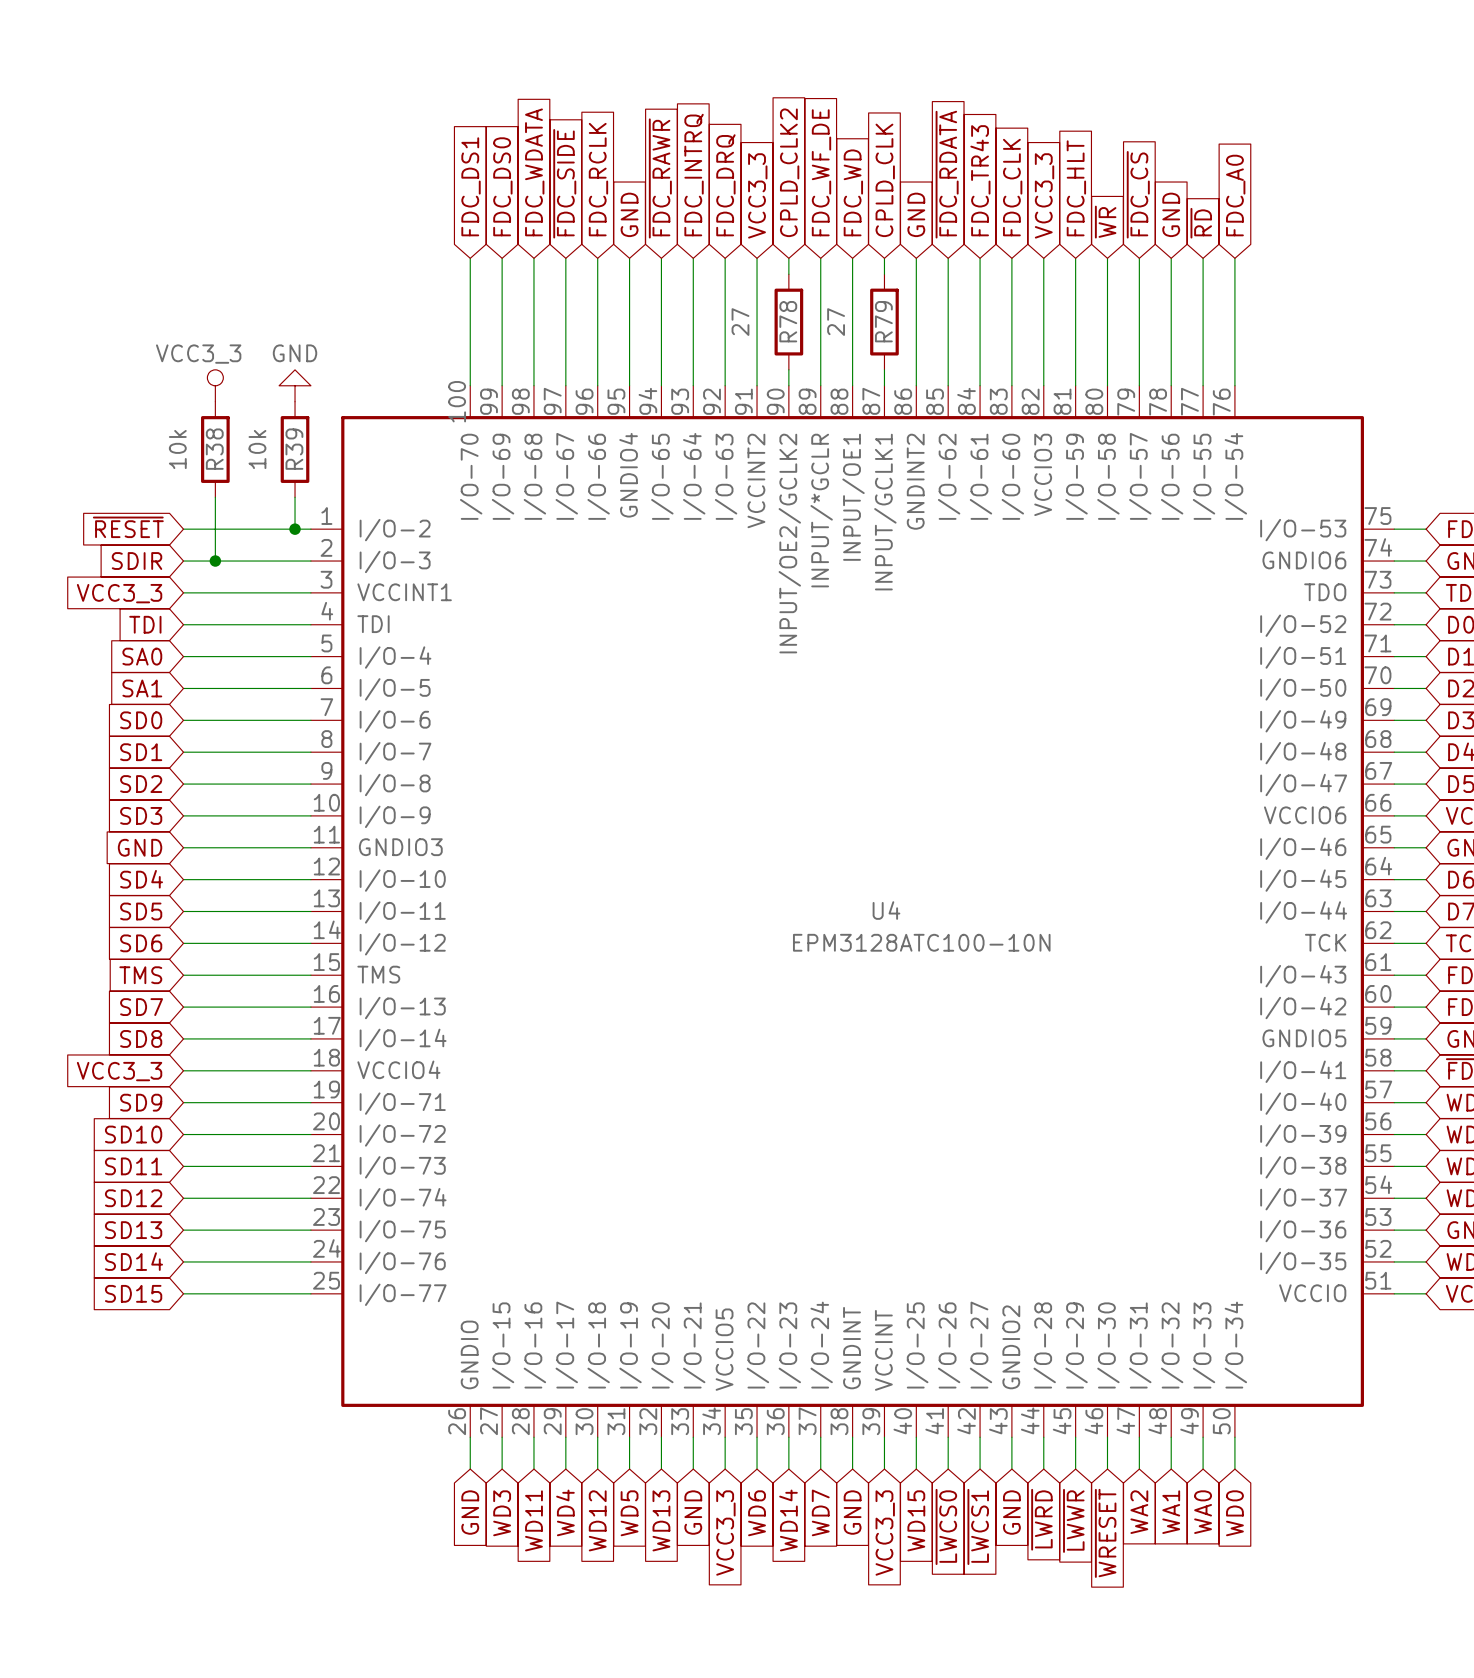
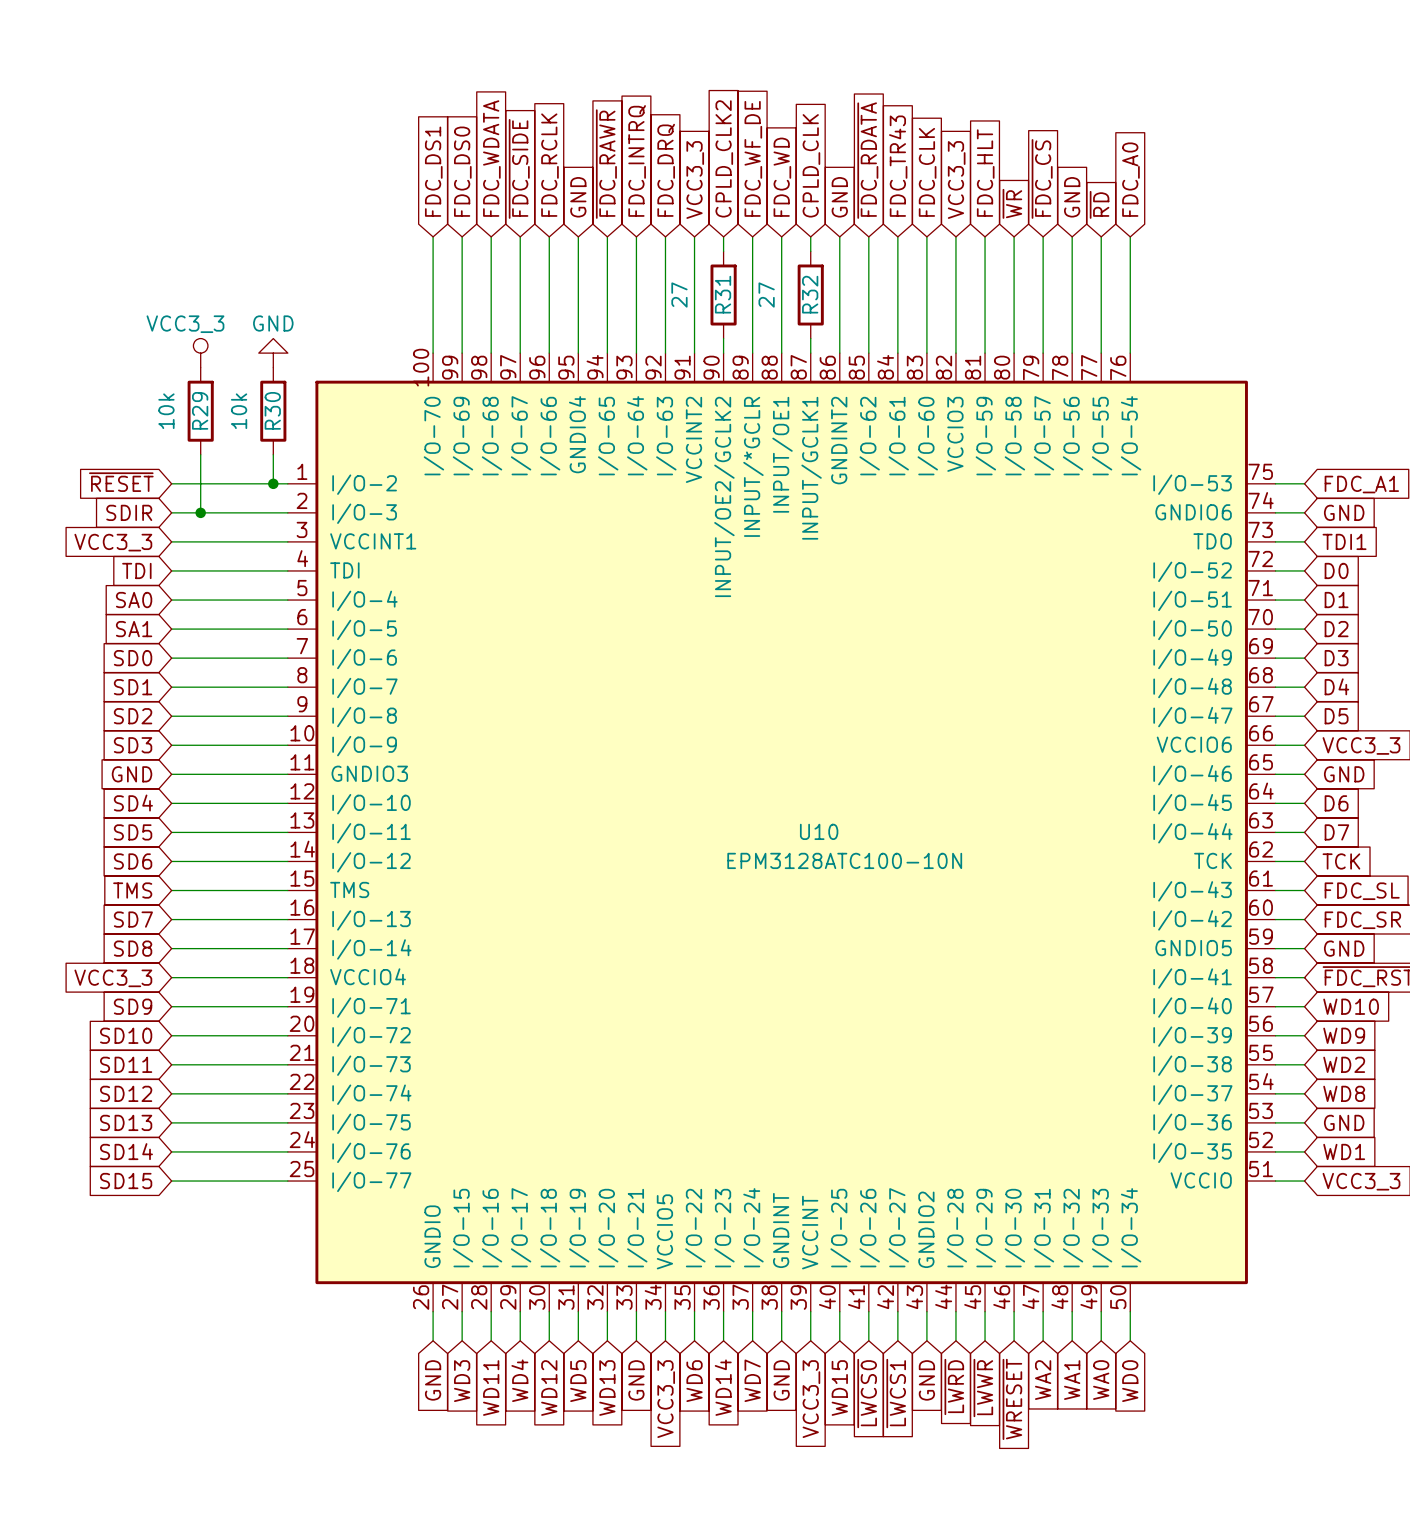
R78 name: R78 (788, 321) -> R31 (723, 294)
R79 name: R79 (883, 321) -> R32 (810, 294)
R38 name: R38 (214, 449) -> R29 (200, 410)
R39 name: R39 (294, 449) -> R30 (272, 410)
U4 name: U4 (886, 910) -> U10 (819, 831)

